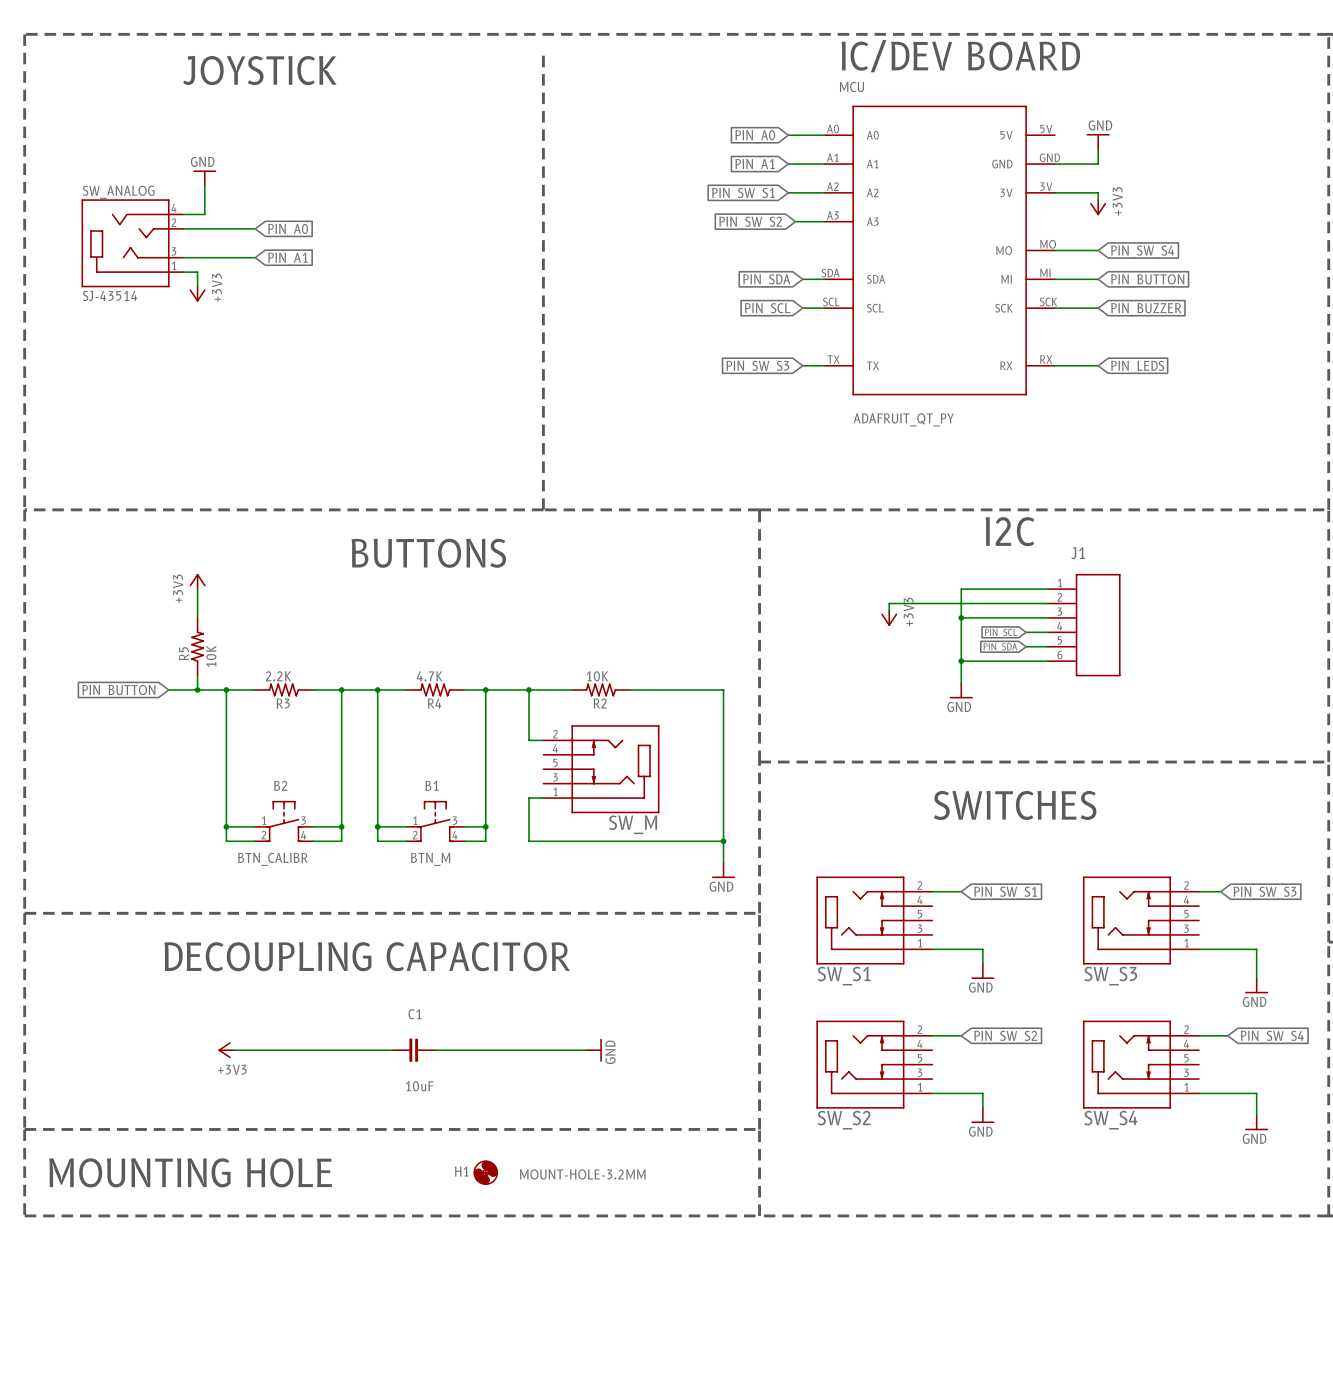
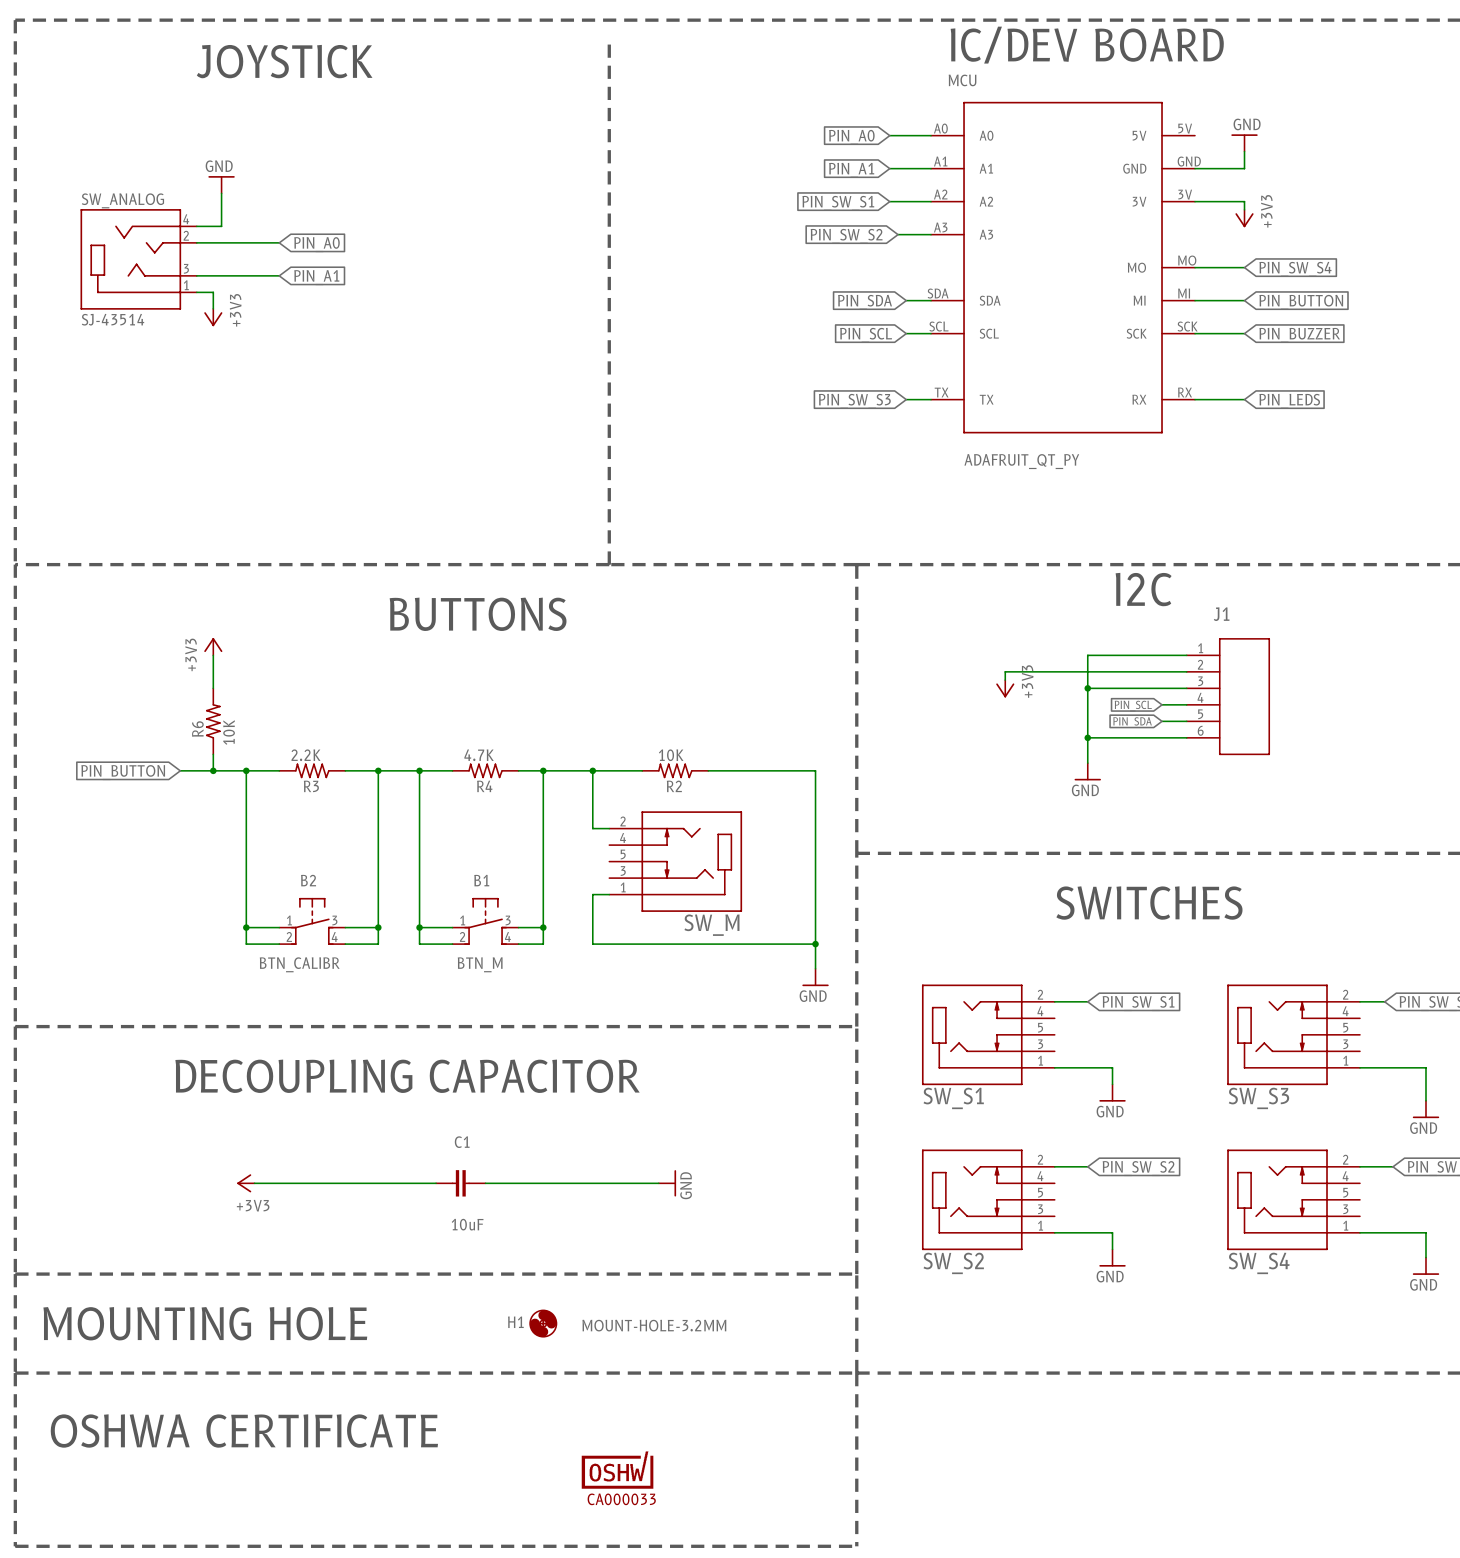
R5 name: R5 (184, 653) -> R6 (197, 729)
line: none -> (15, 1373) (15, 1546) (856, 1546) (856, 1373)
text: none -> OSHWA CERTIFICATE (244, 1431)
part: none -> CA000033 (617, 1470)

